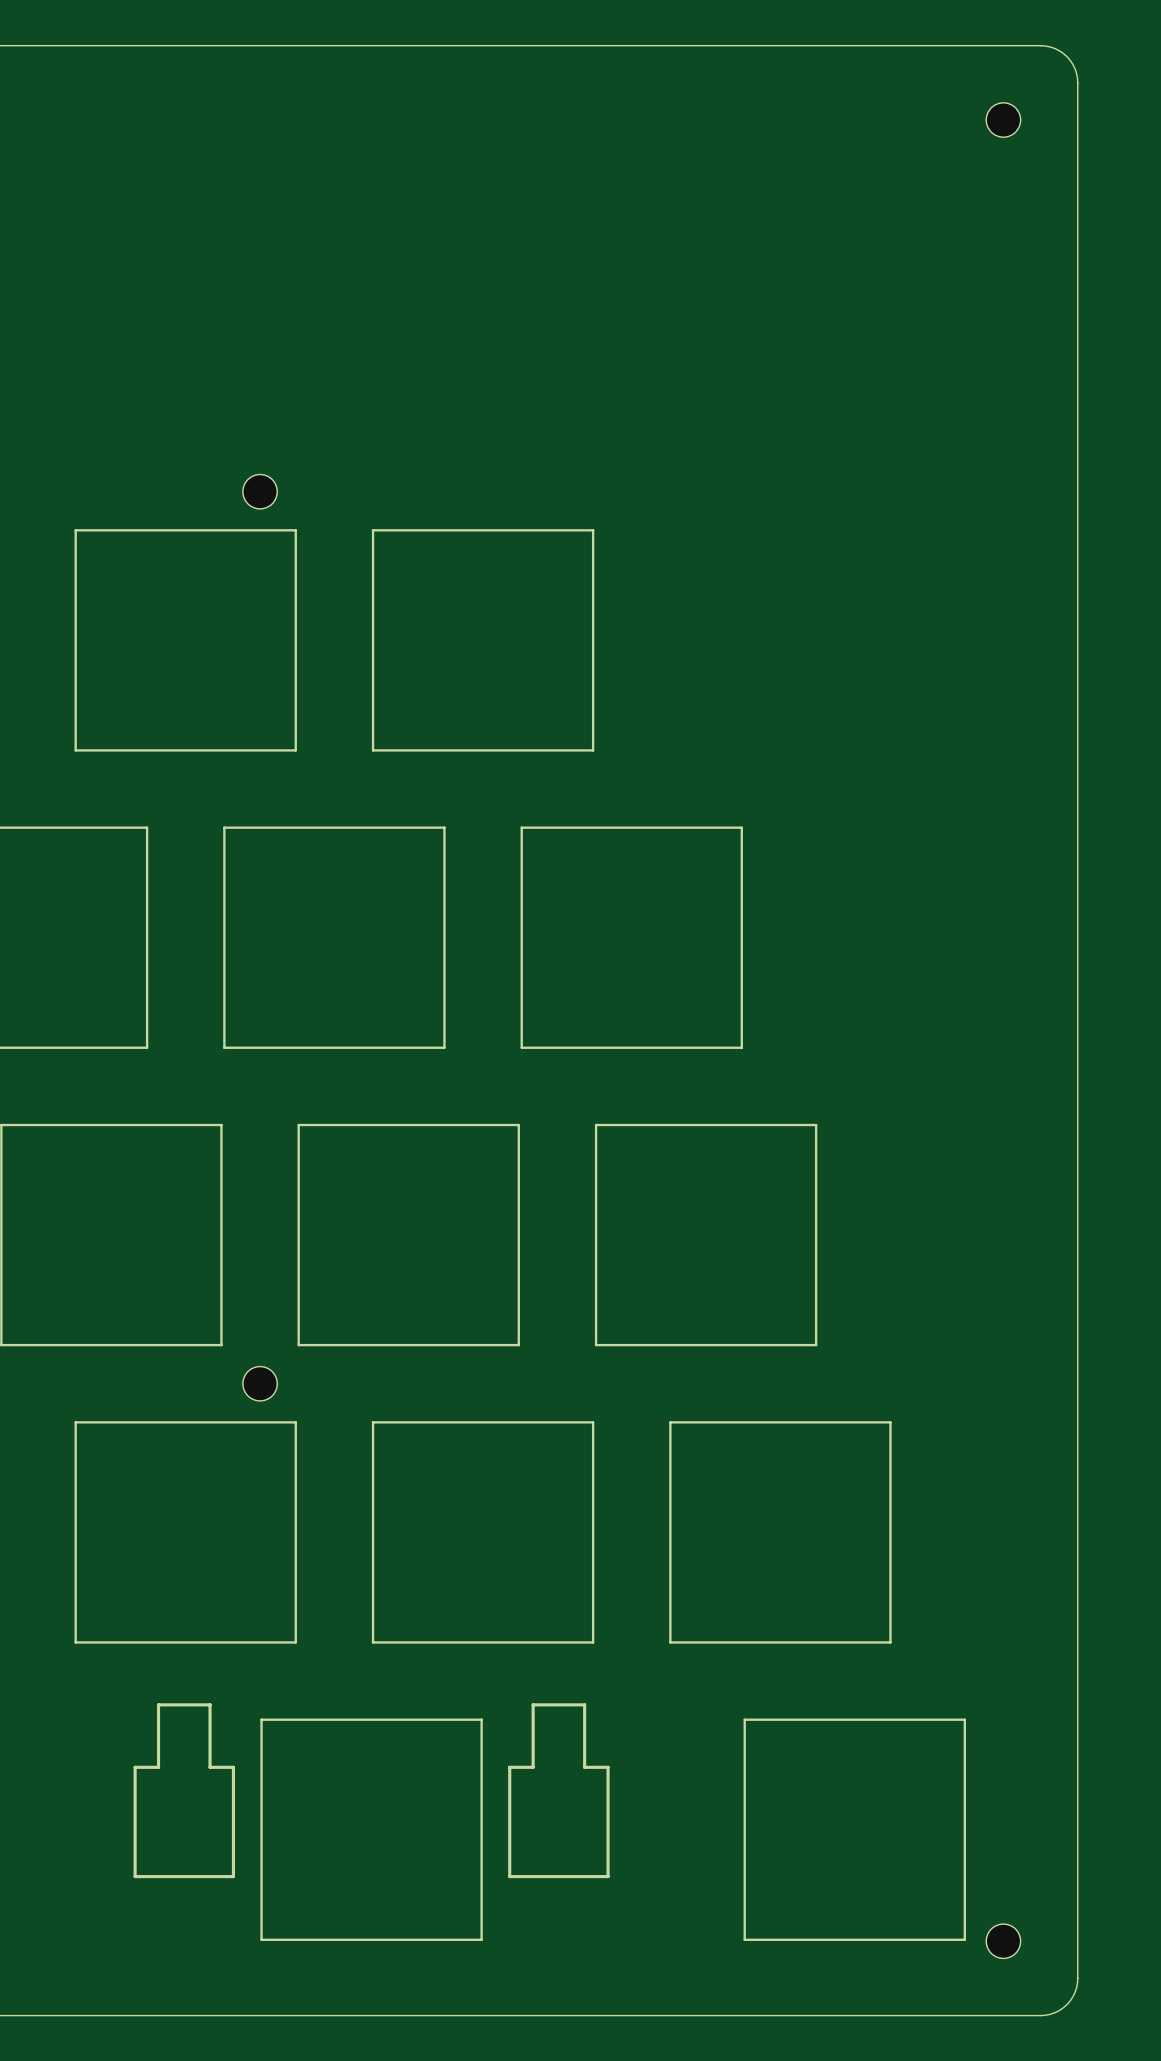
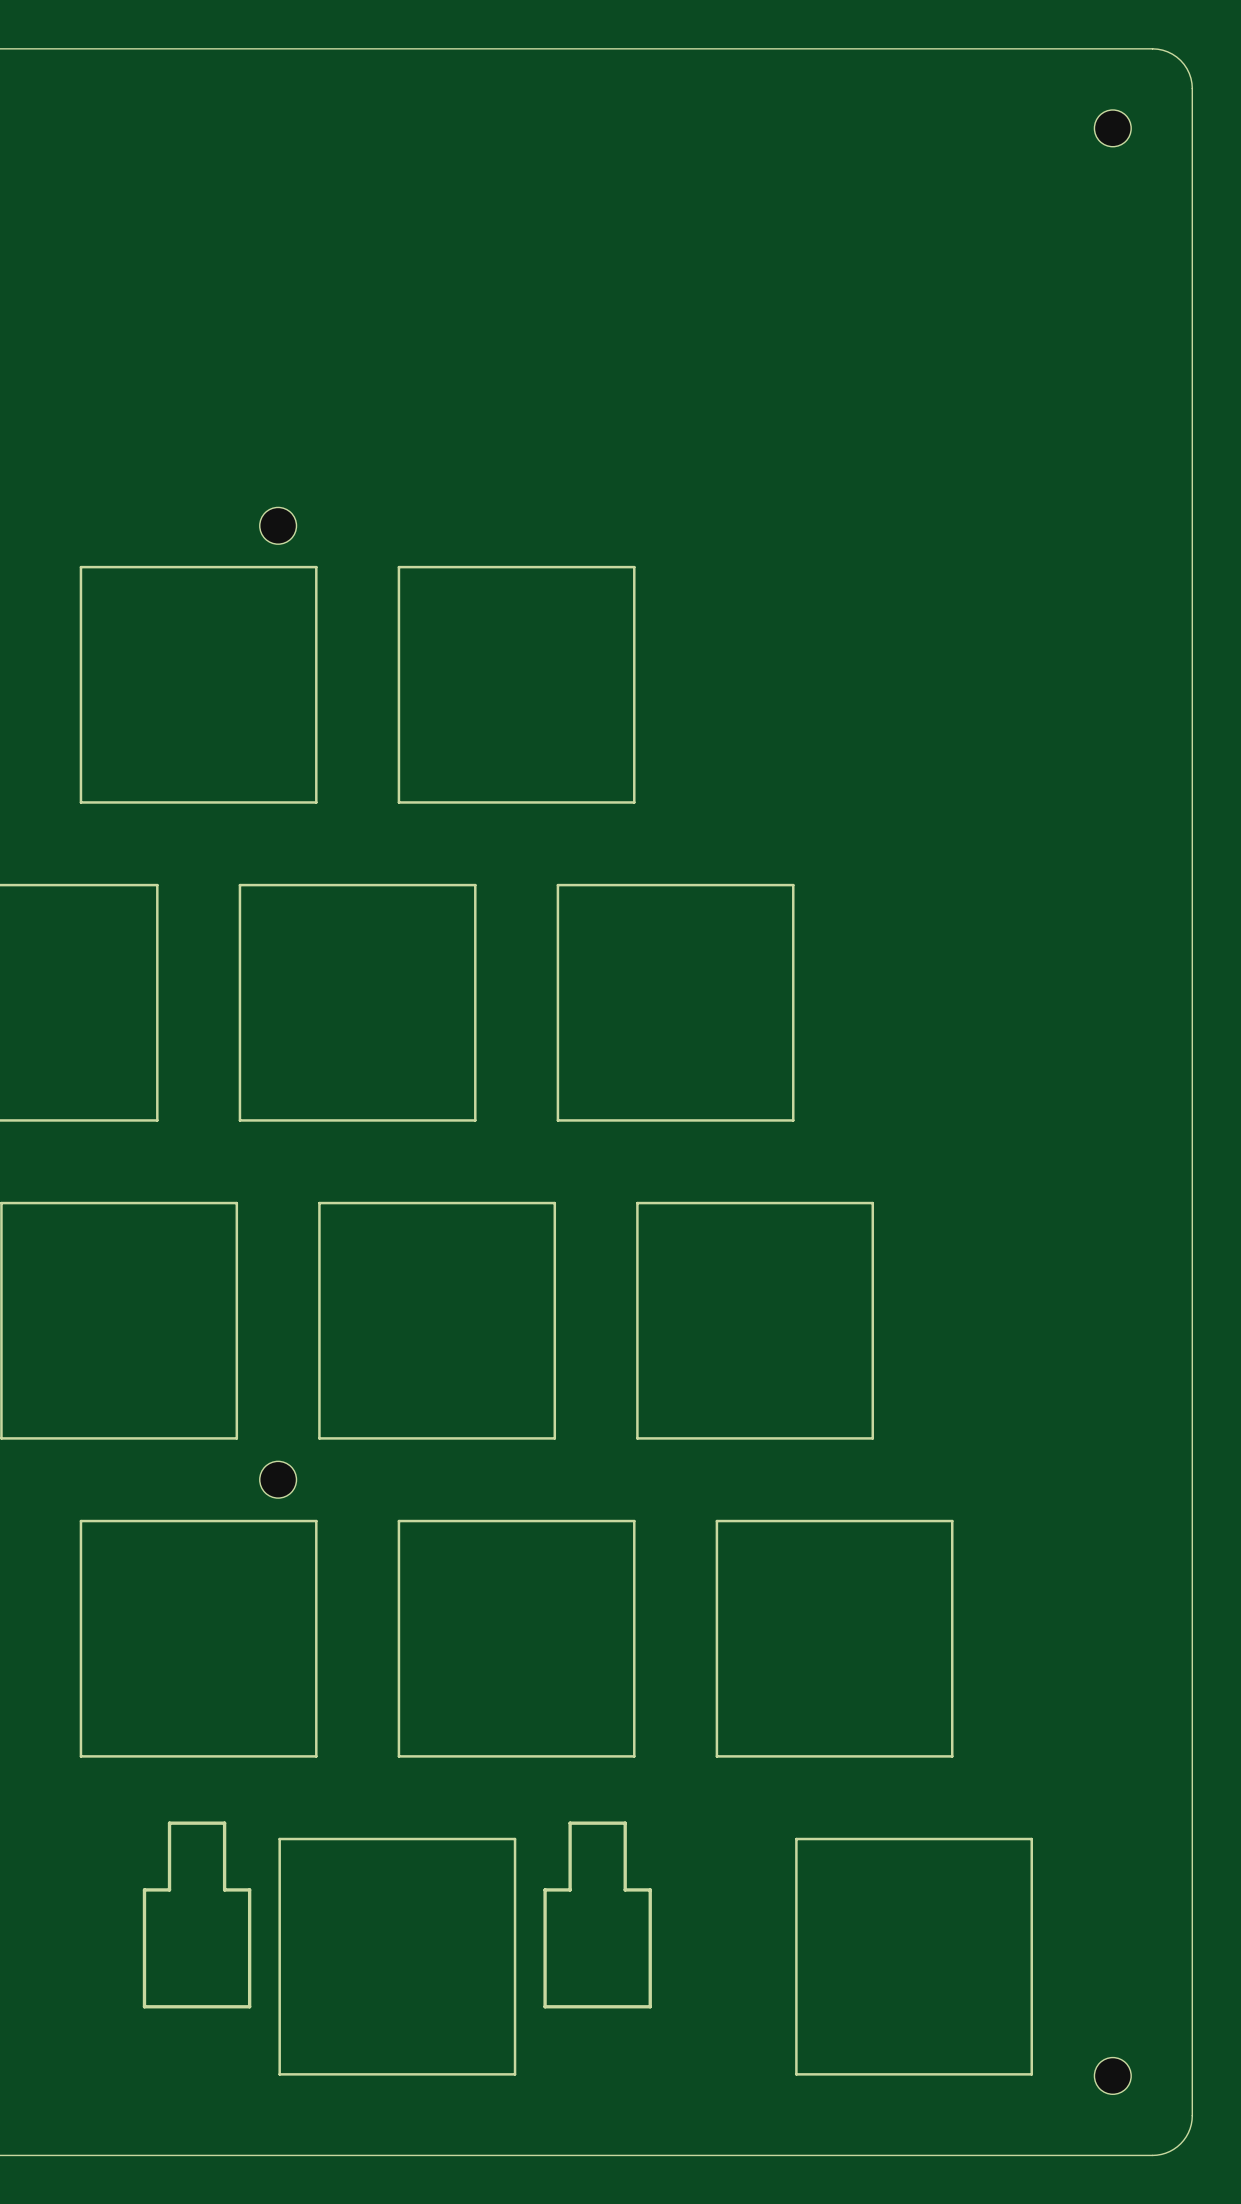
board edge: (1040, 45) (1054, 48) (1066, 56) (1074, 68) (1077, 82) (1077, 1978) (1074, 1992) (1066, 2004) (1054, 2012) (1040, 2015) -> (1112, 48) (1157, 49) (1172, 54) (1186, 68) (1192, 88) (1192, 2115) (1186, 2136) (1169, 2151) (1157, 2155) (1112, 2155)
part position: (1003, 120) -> (1112, 128)
part position: (1003, 1941) -> (1112, 2075)

